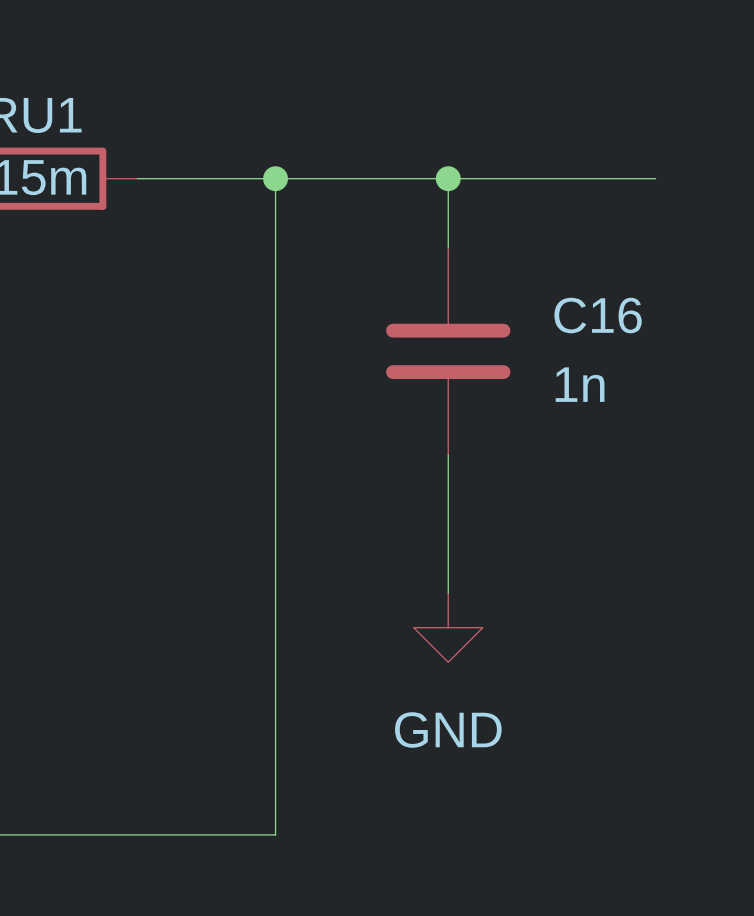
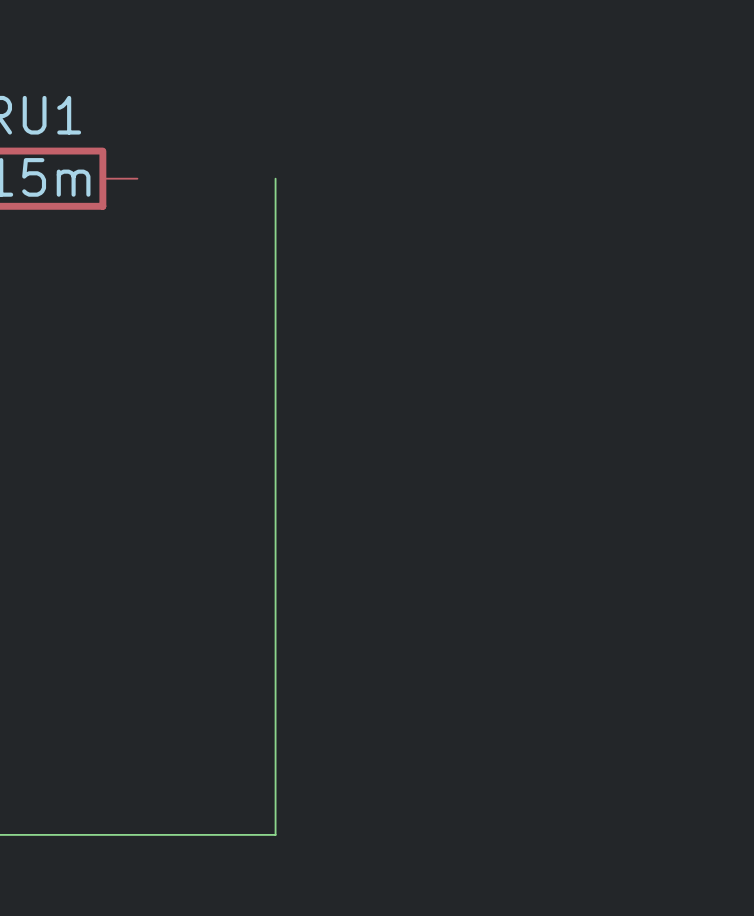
wire: (137, 178) (655, 178) -> none
junction: (275, 178) -> none
wire: (448, 178) (448, 247) -> none
junction: (448, 178) -> none
C16: 1n (448, 351) -> none
wire: (448, 454) (448, 593) -> none
power symbol: GND (448, 627) -> none

